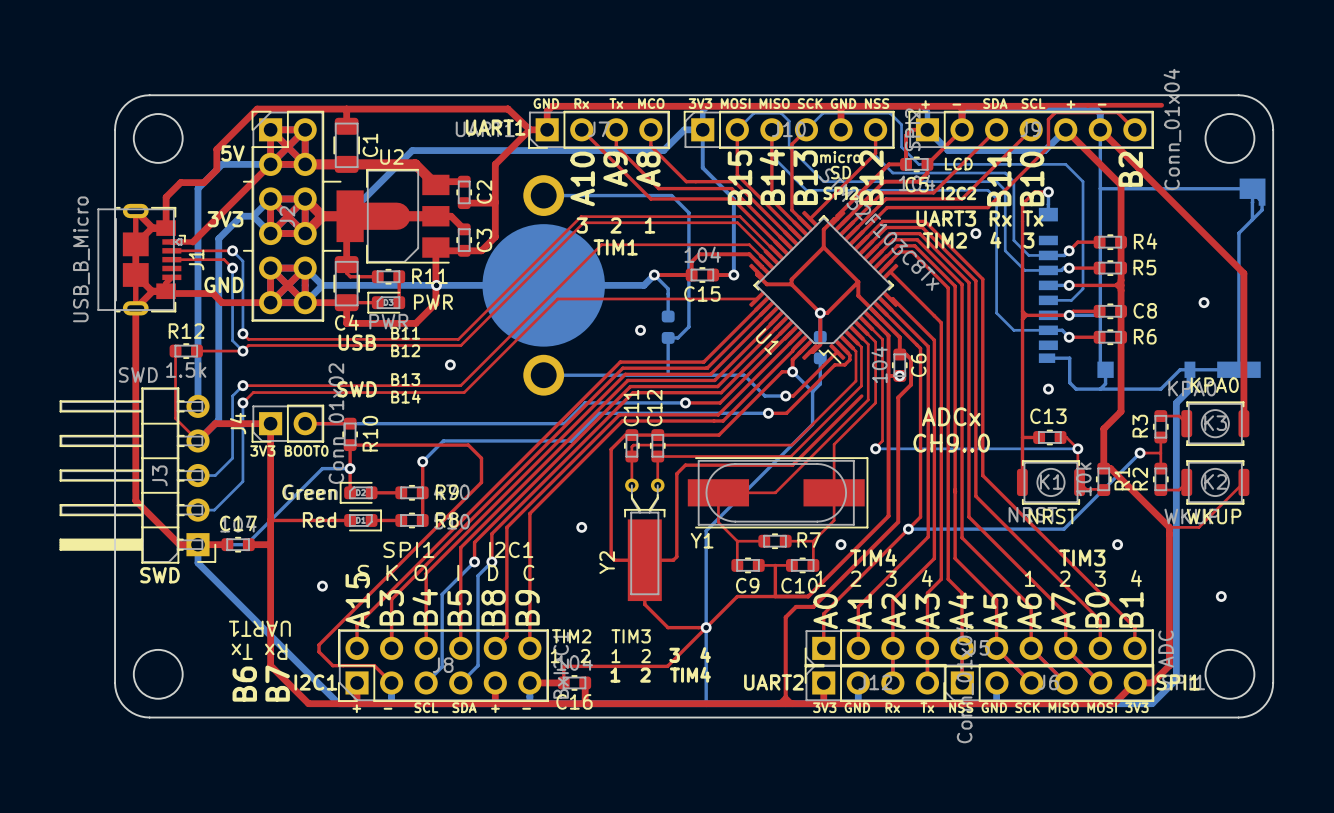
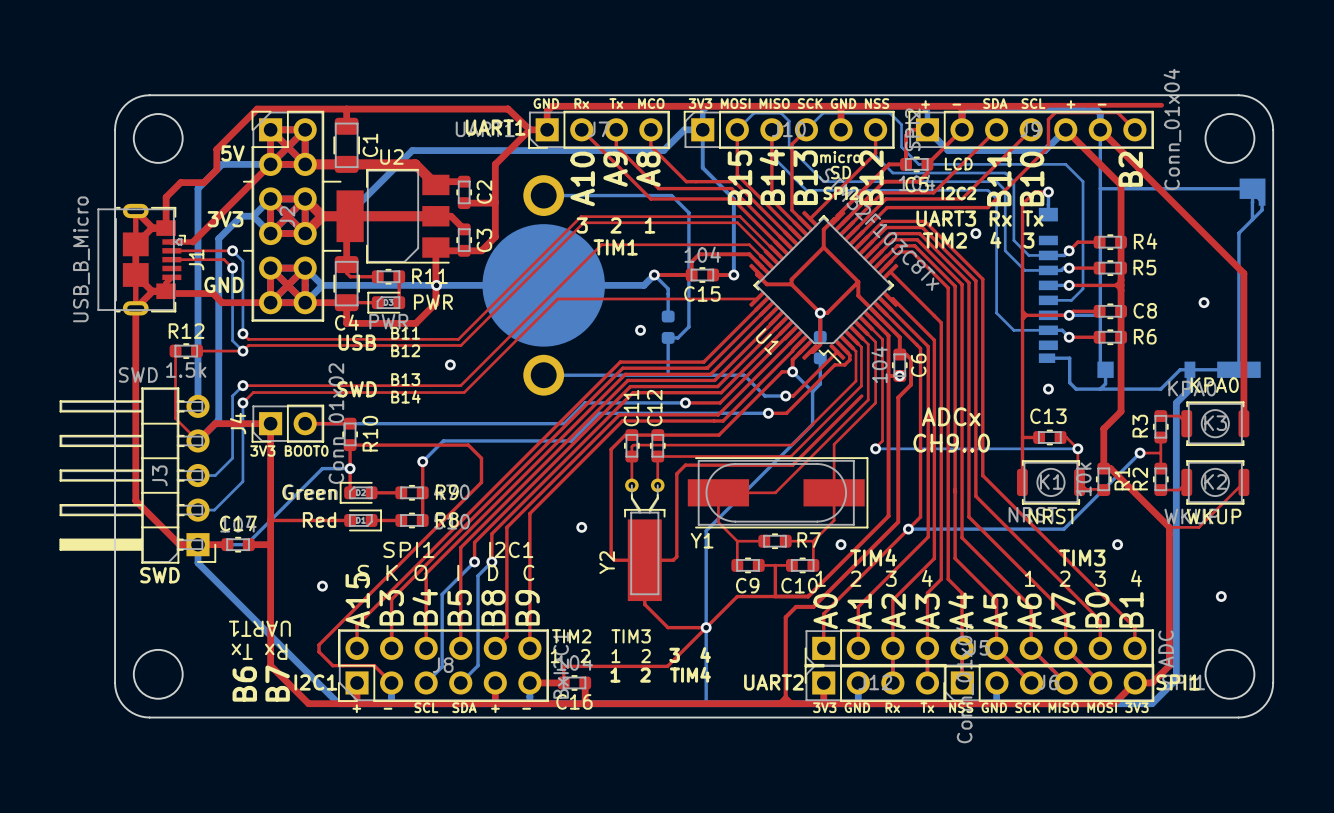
top track width: thick (350, 216) (396, 216) -> thin (350, 216) (396, 216)

